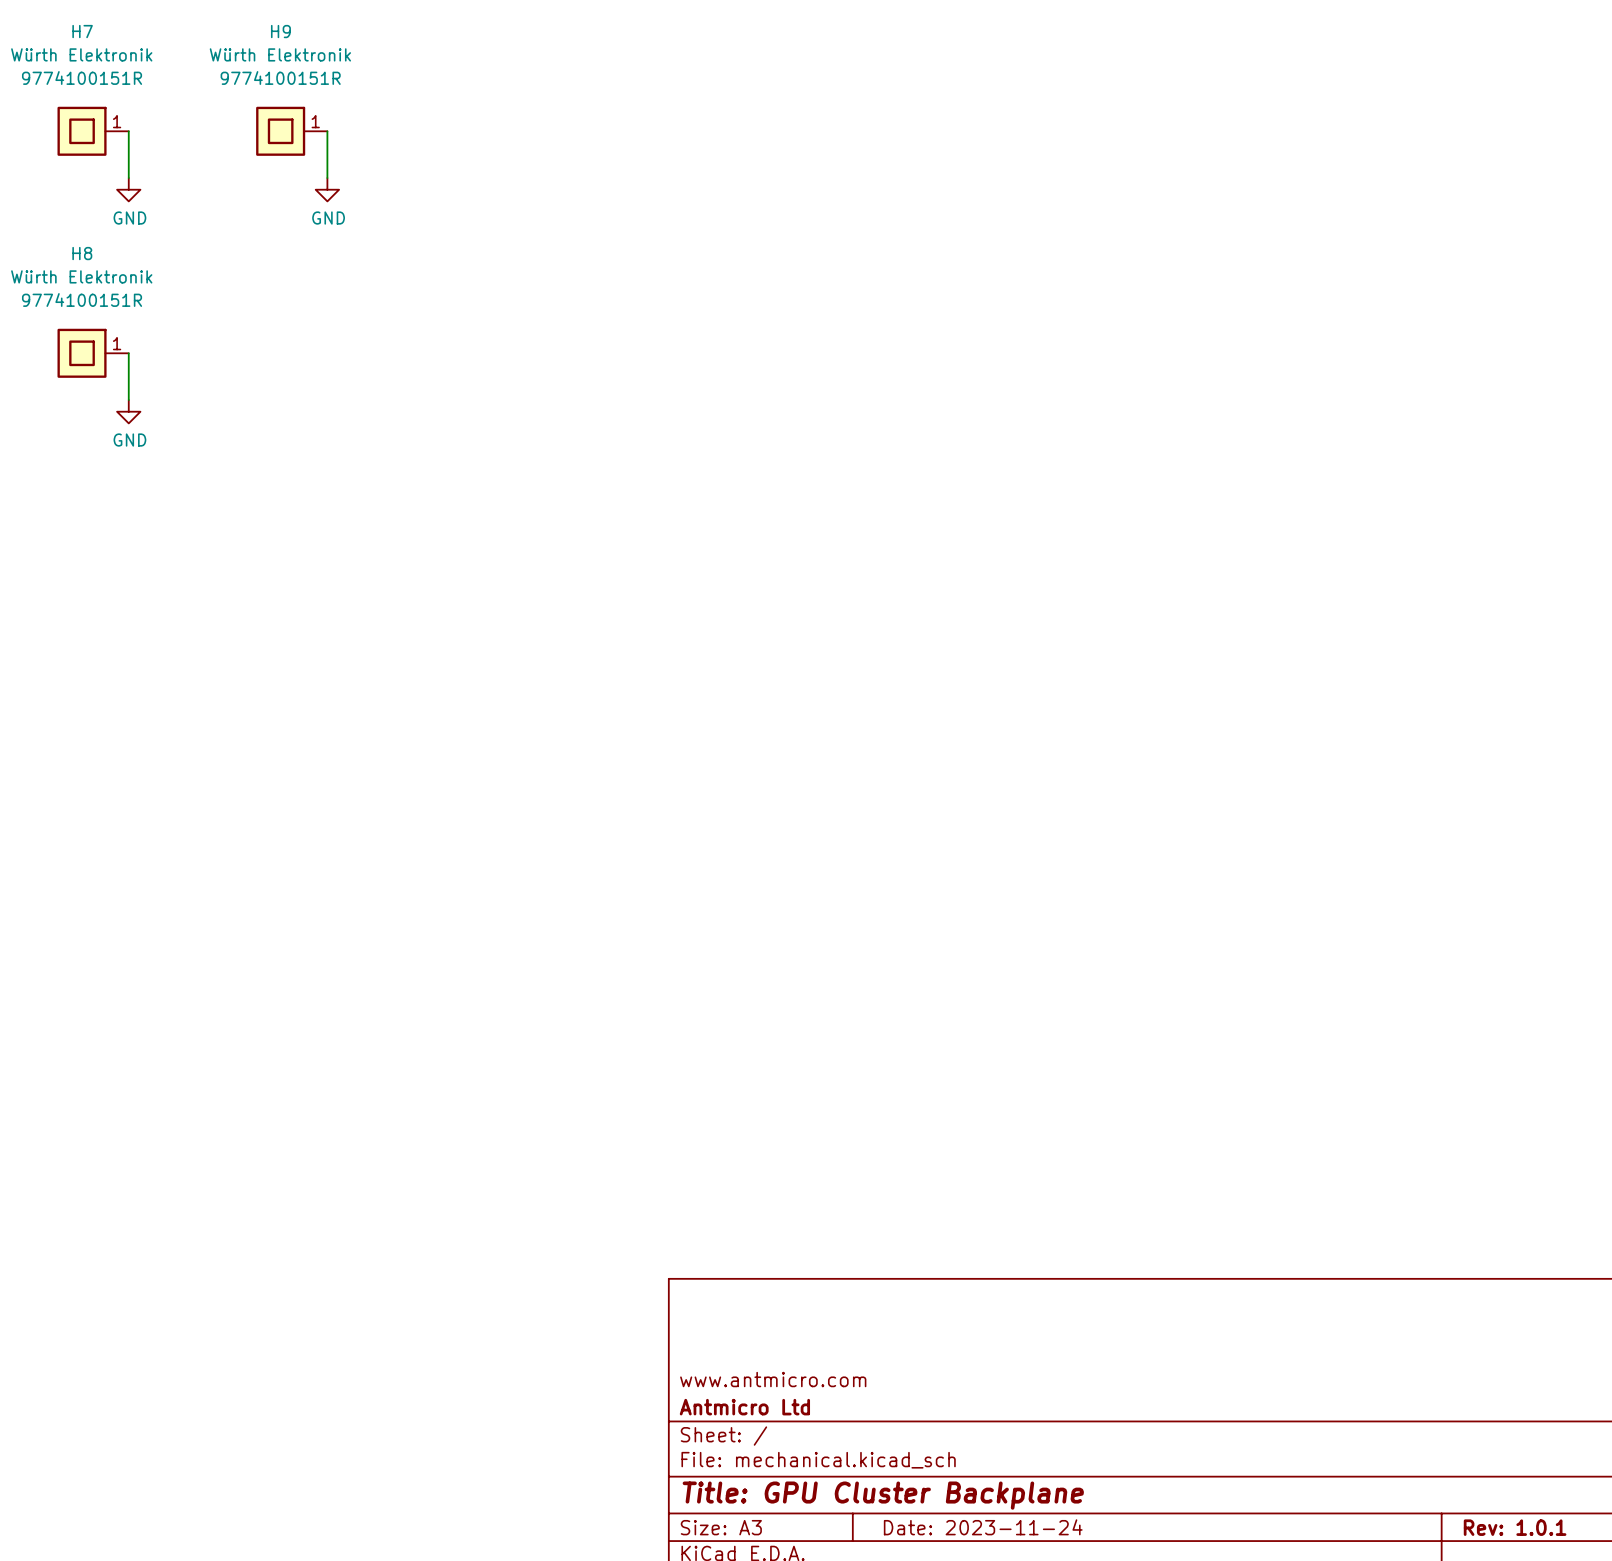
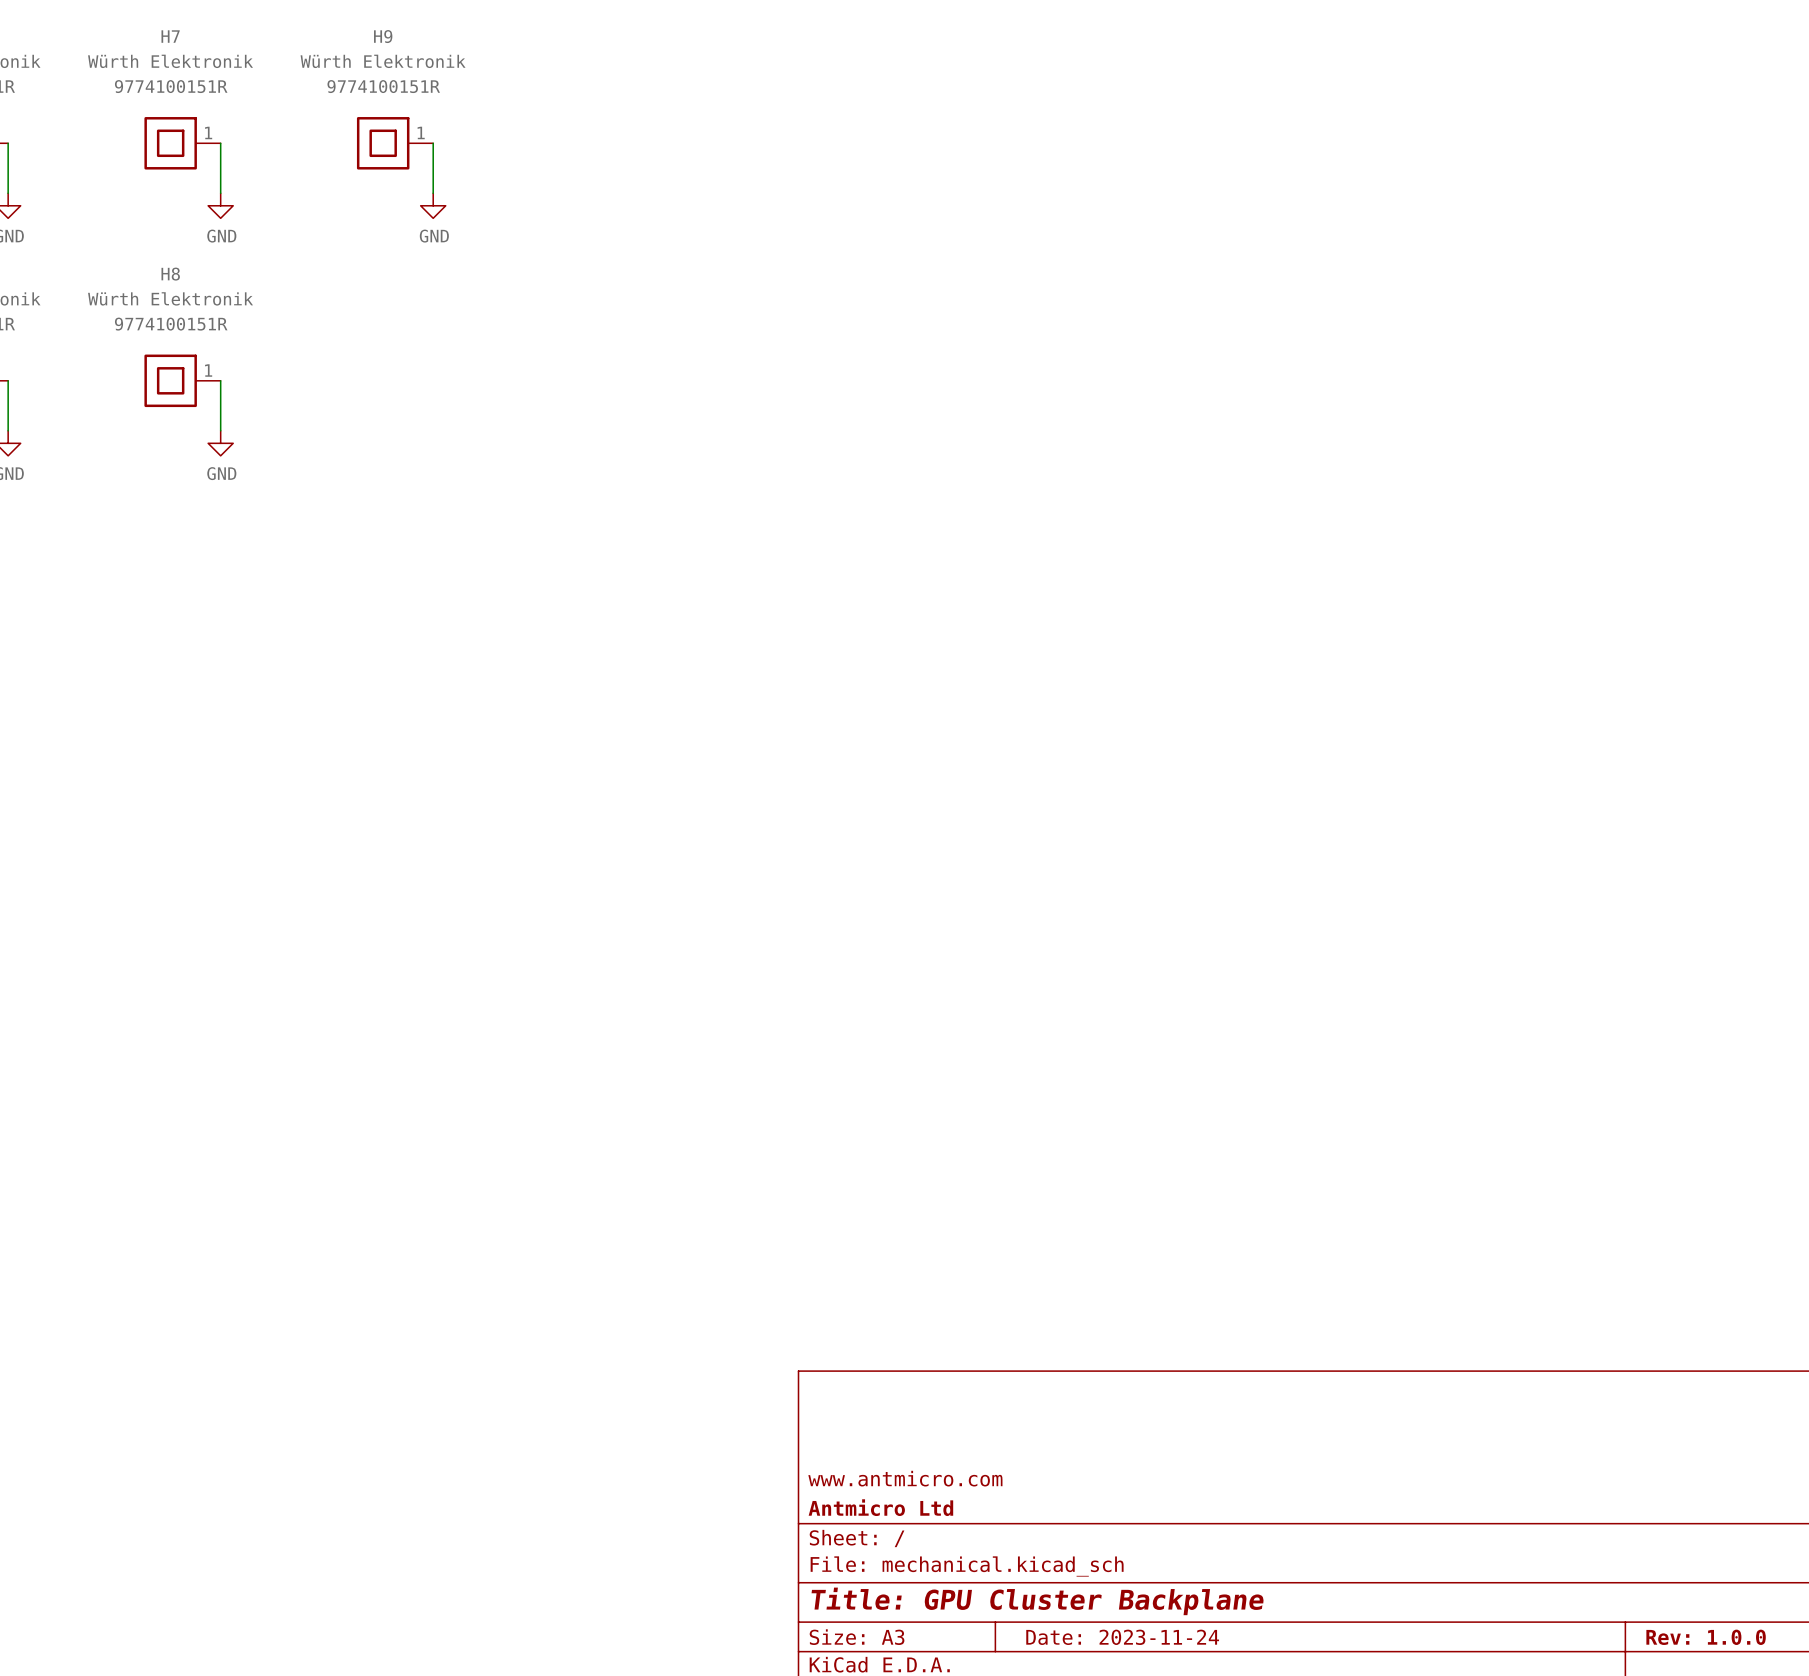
title block: Rev: 1.0.1 (1515, 1527) -> Rev: 1.0.0 (1706, 1637)

